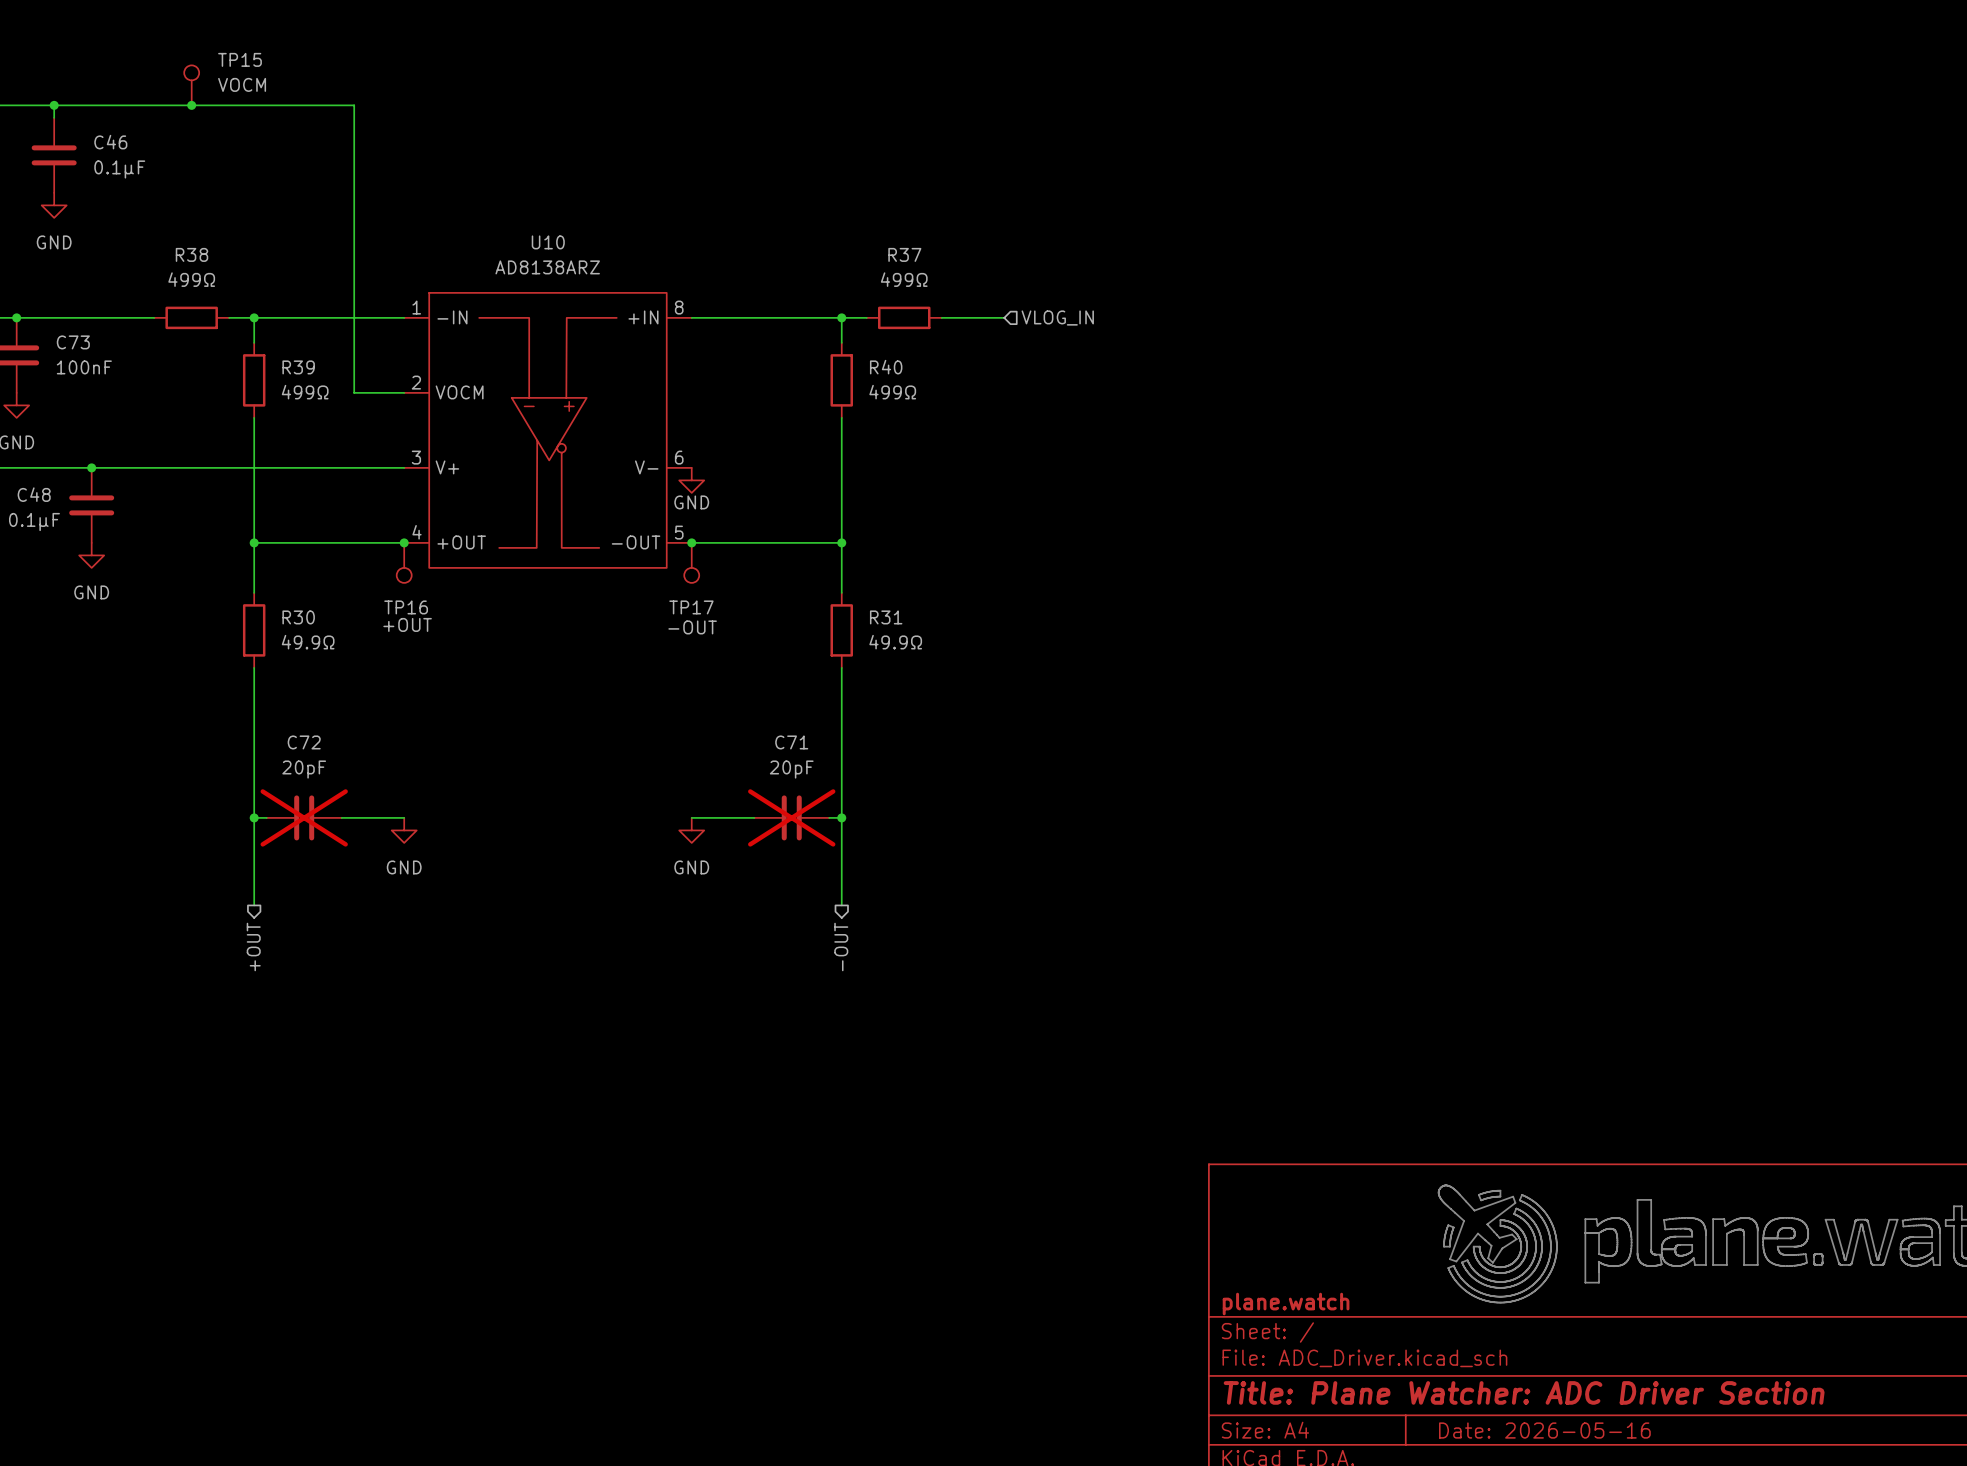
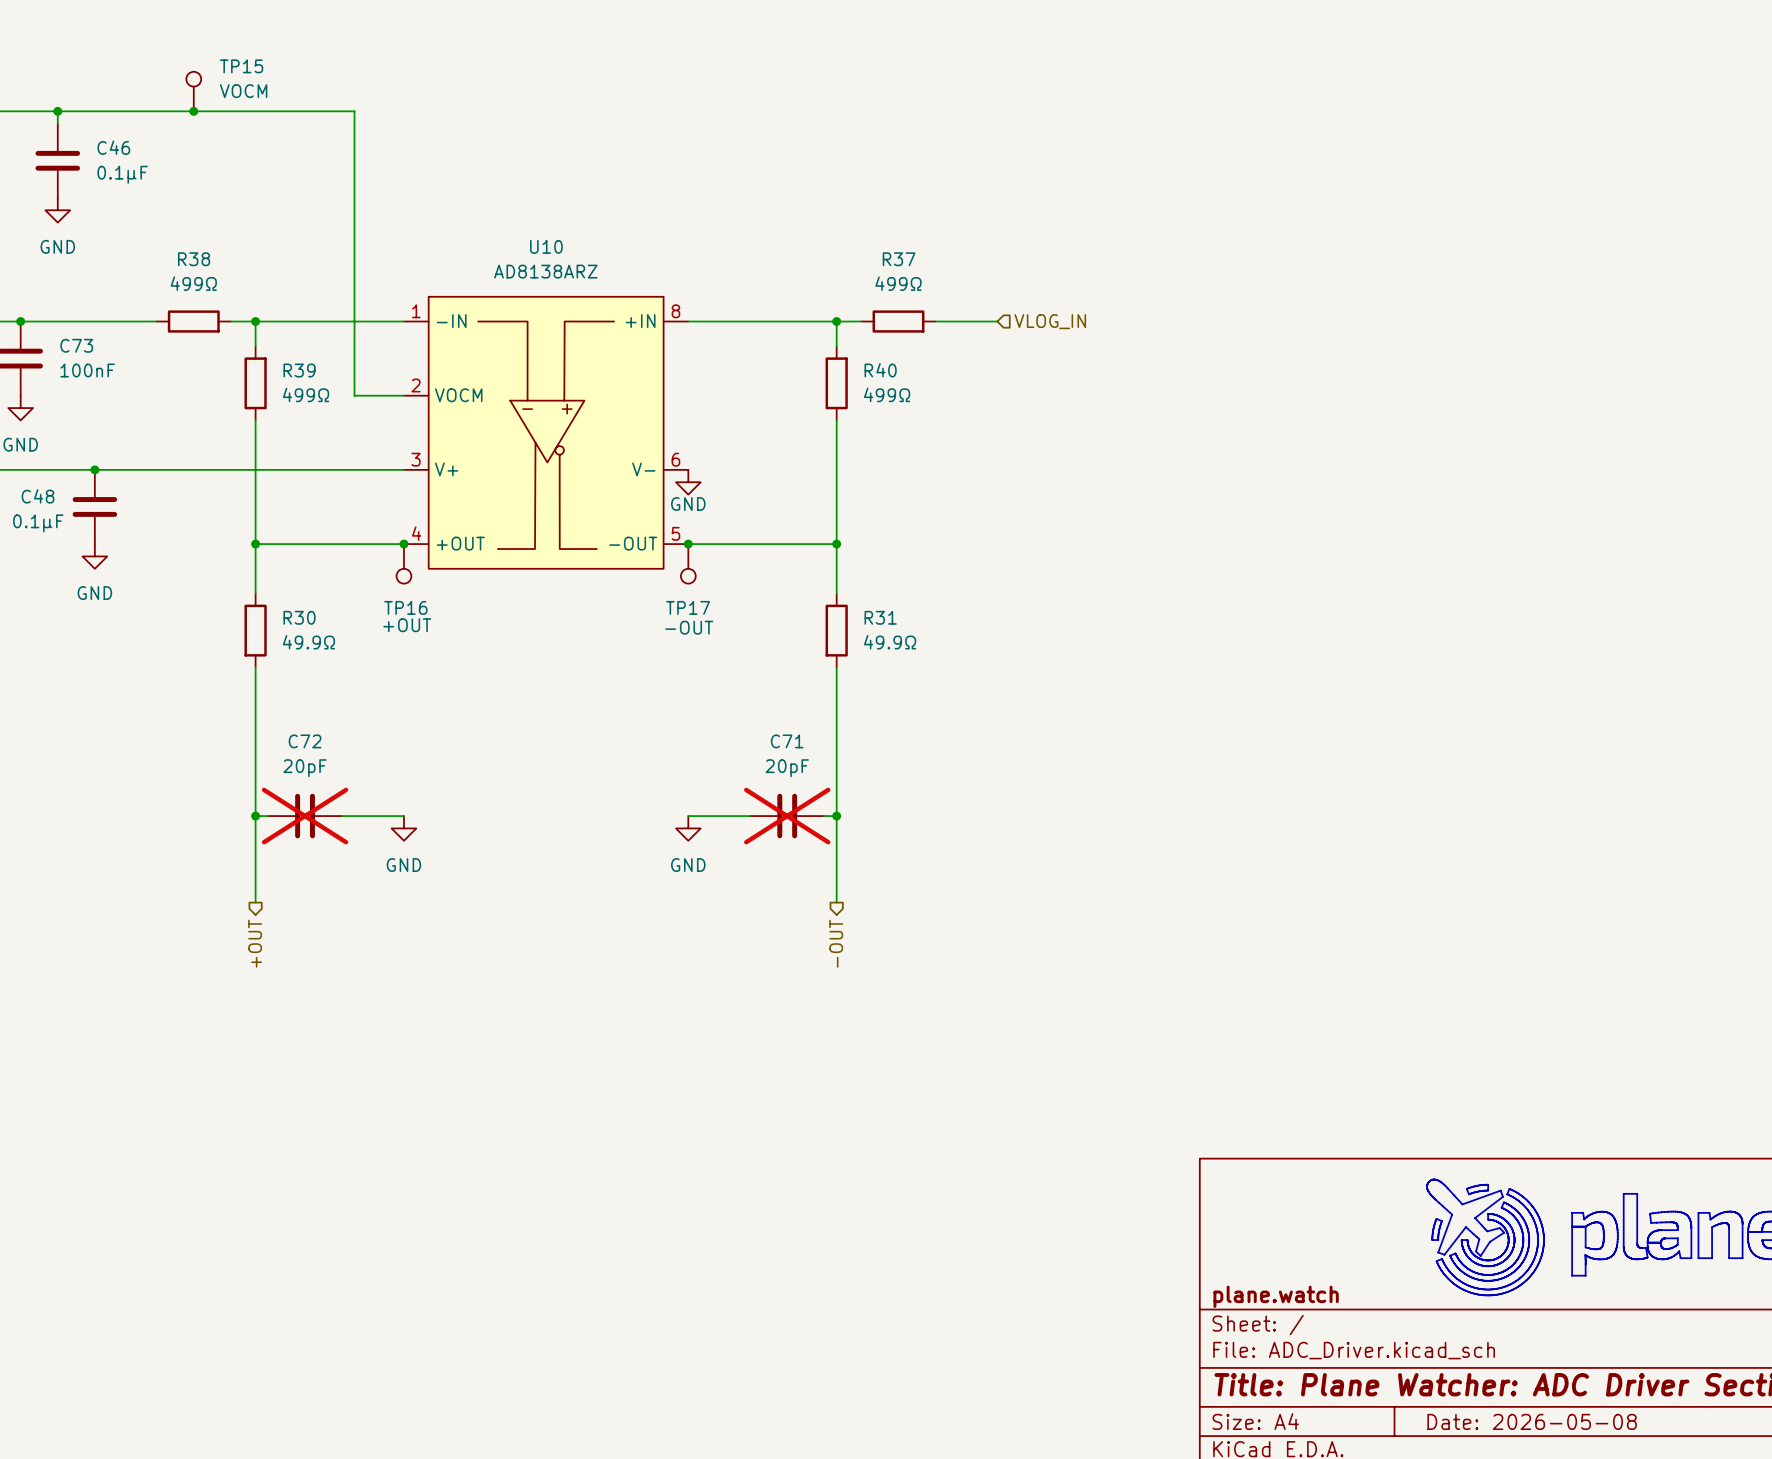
title block: Date: 2026-05-16 (1544, 1430) -> Date: 2026-05-08 (1532, 1421)

